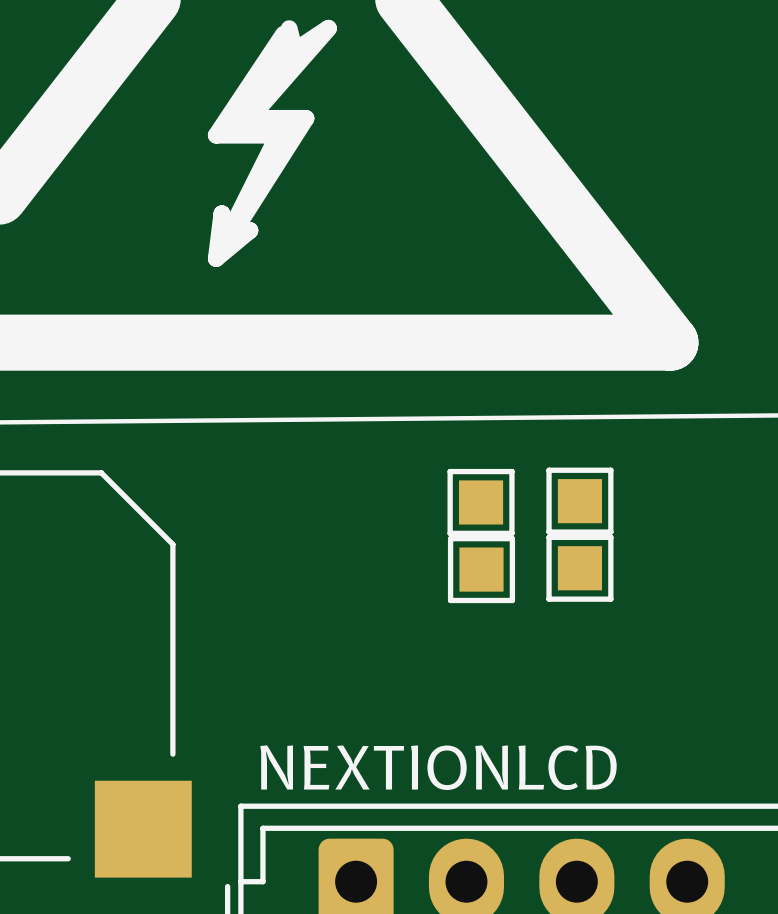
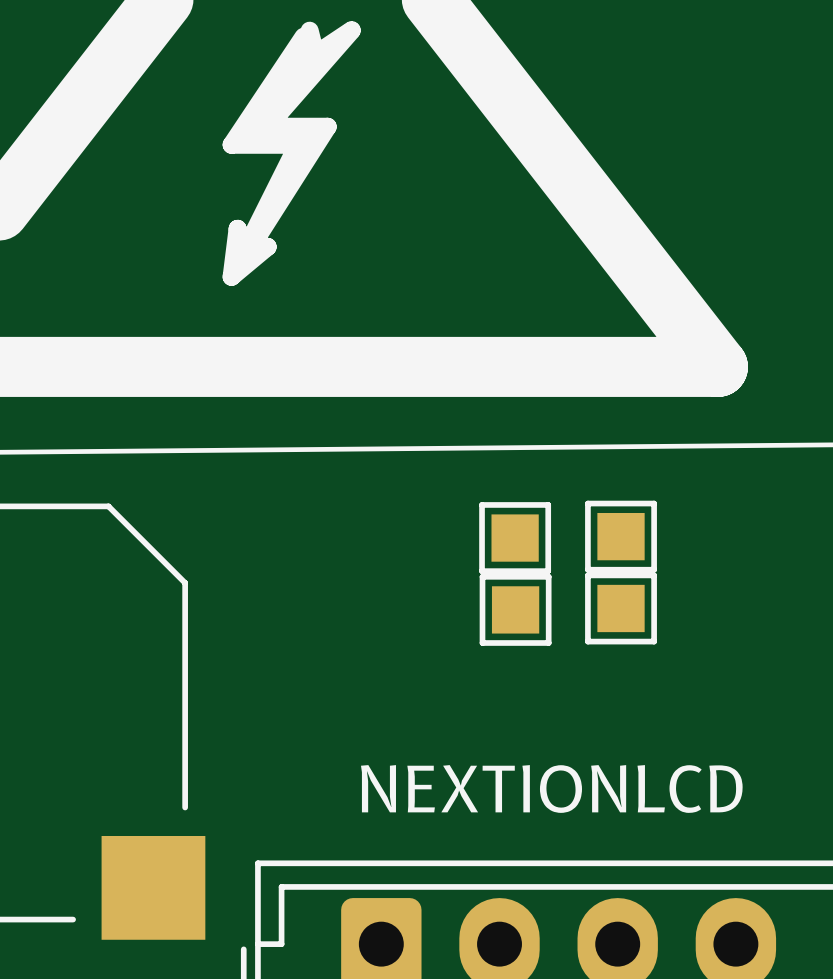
text position: NEXTIONLCD (438, 767) -> NEXTIONLCD (551, 788)

